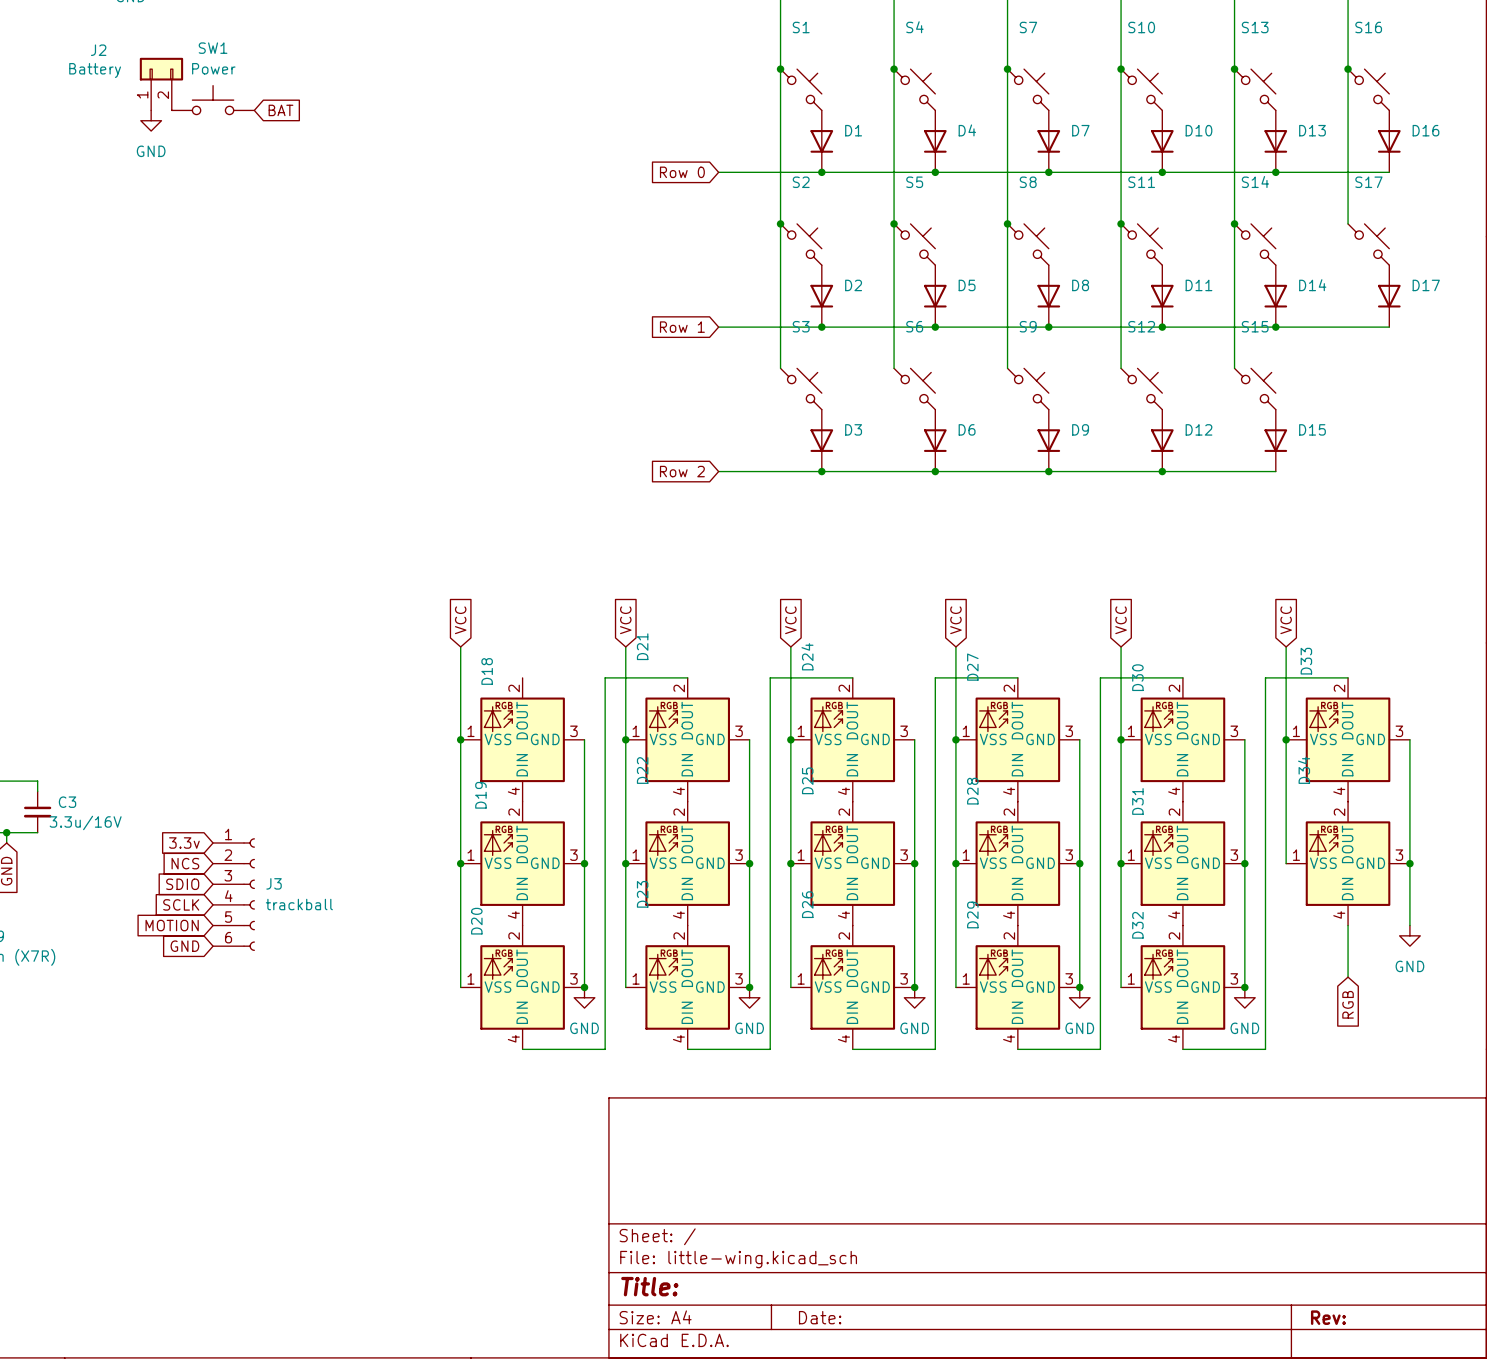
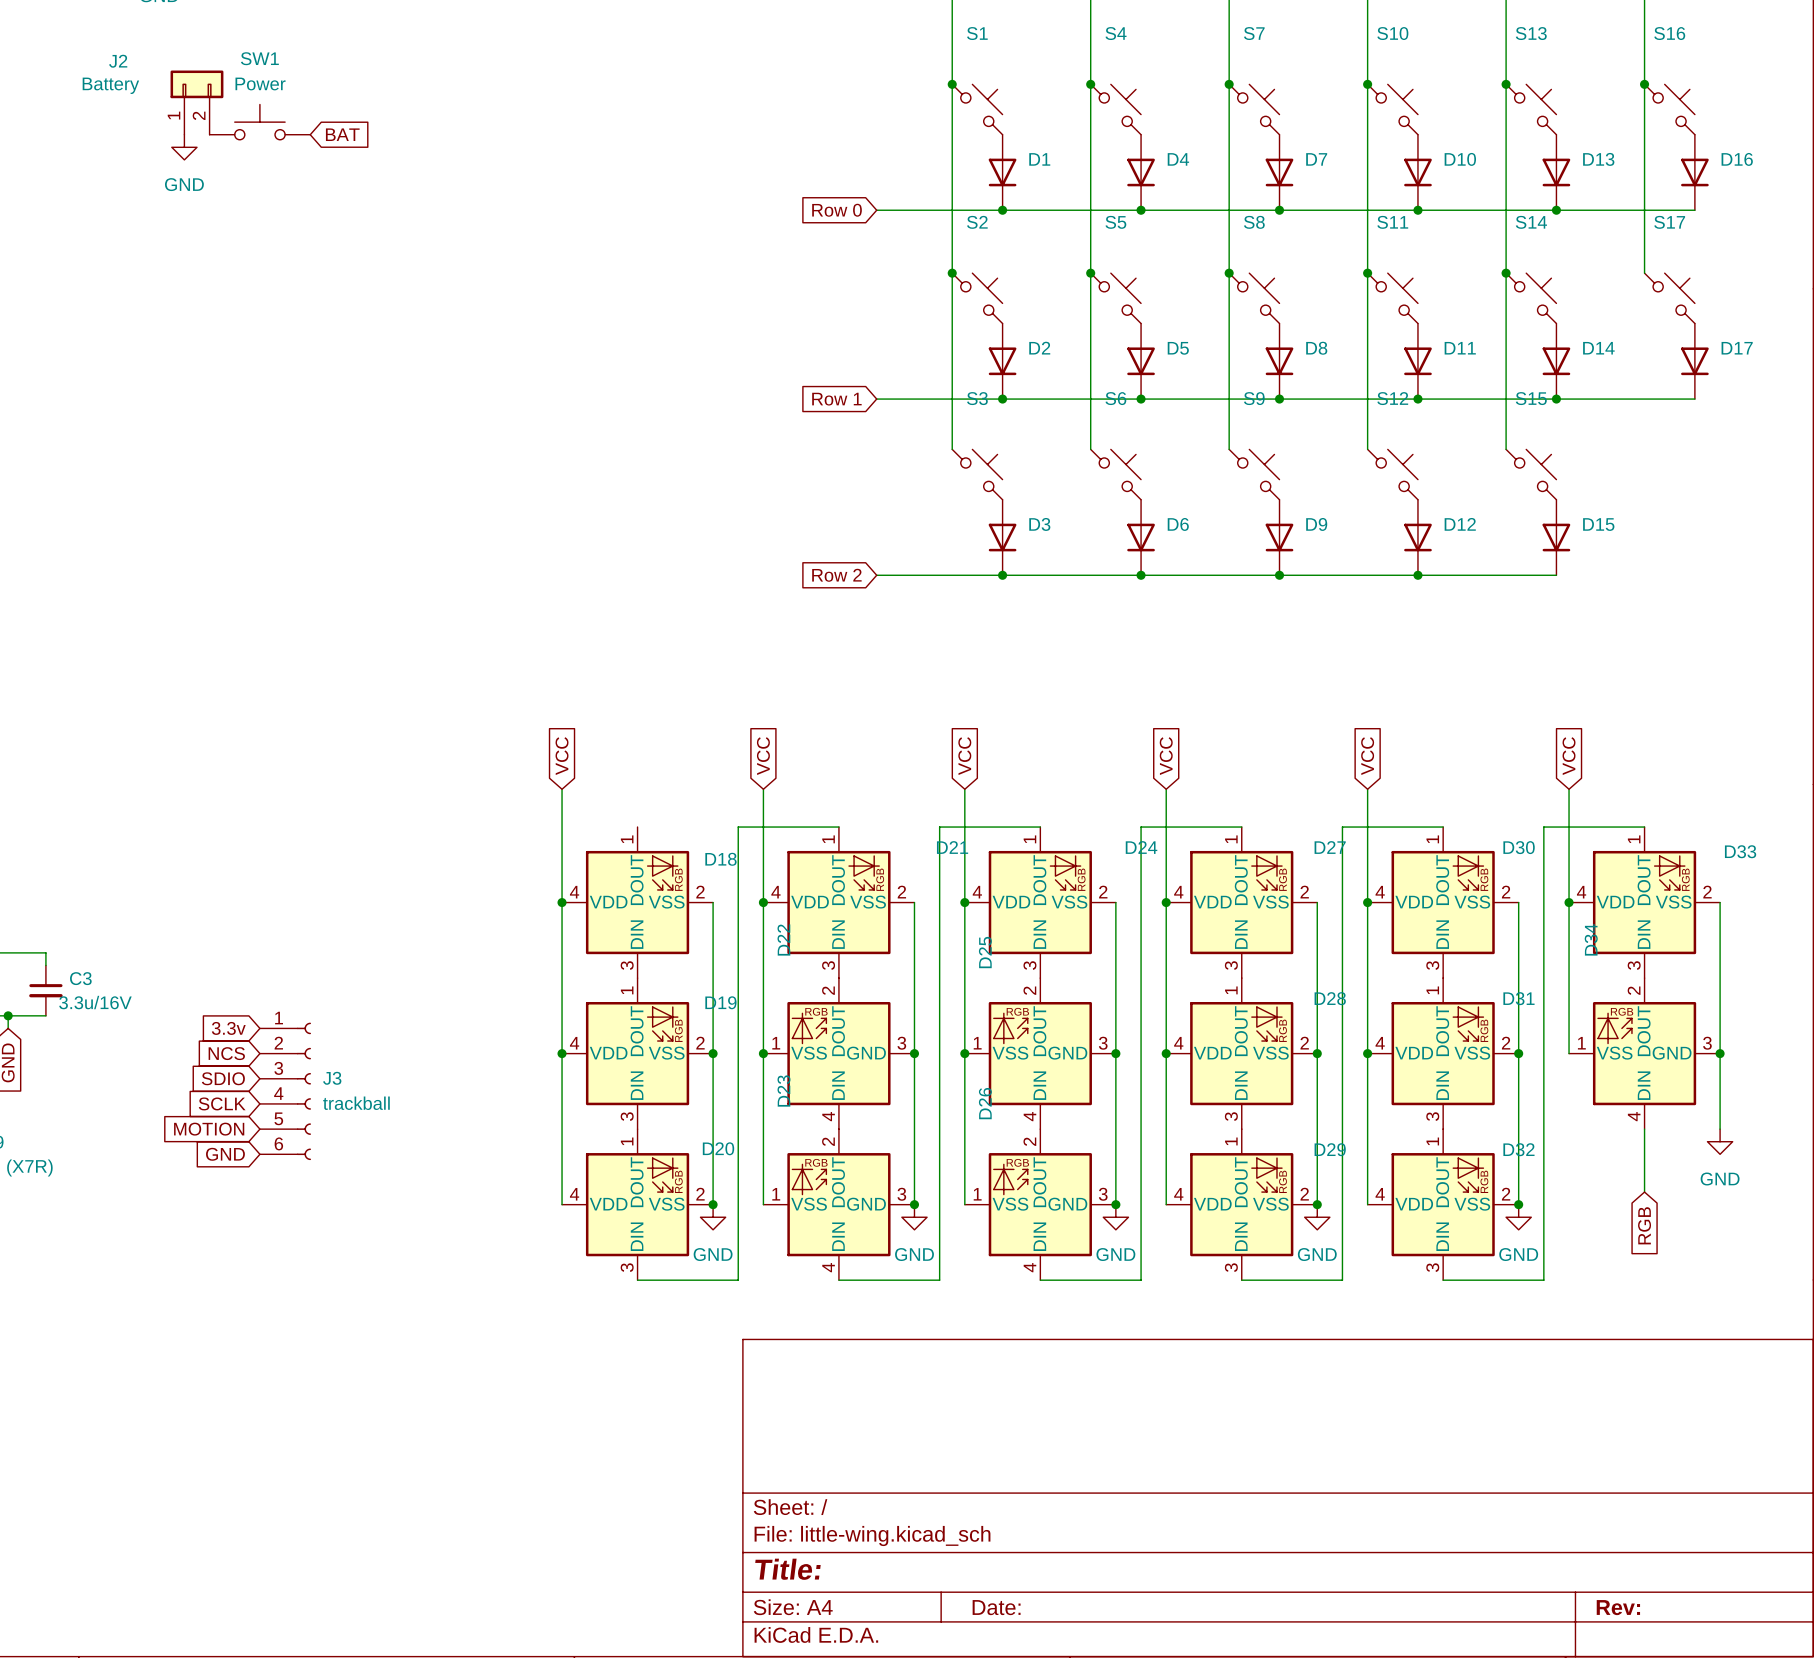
D21 name position: D21 (642, 646) -> D21 (952, 847)
D24 name position: D24 (807, 656) -> D24 (1141, 847)
D33 name position: D33 (1306, 661) -> D33 (1740, 851)
D27 name position: D27 (972, 667) -> D27 (1330, 847)
D18 name position: D18 (487, 671) -> D18 (720, 859)
D18 symbol: [460, 677, 585, 802] -> [562, 827, 714, 979]
D21 symbol: [625, 677, 750, 802] -> [763, 827, 915, 979]
D24 symbol: [790, 677, 915, 802] -> [964, 827, 1116, 979]
D27 symbol: [955, 677, 1080, 802] -> [1166, 827, 1318, 979]
D30 symbol: [1121, 677, 1245, 802] -> [1367, 827, 1519, 979]
D30 name position: D30 (1137, 677) -> D30 (1519, 847)
D33 symbol: [1286, 677, 1410, 802] -> [1569, 827, 1721, 979]
D28 name position: D28 (972, 791) -> D28 (1330, 998)
D19 name position: D19 (480, 795) -> D19 (720, 1002)
D19 symbol: [460, 801, 585, 926] -> [562, 978, 714, 1130]
D28 symbol: [955, 801, 1080, 926] -> [1166, 978, 1318, 1130]
D31 symbol: [1121, 801, 1245, 926] -> [1367, 978, 1519, 1130]
D31 name position: D31 (1137, 801) -> D31 (1518, 998)
D29 name position: D29 (972, 914) -> D29 (1330, 1149)
D20 name position: D20 (476, 921) -> D20 (718, 1148)
D20 symbol: [460, 925, 585, 1050] -> [562, 1129, 714, 1281]
D29 symbol: [955, 925, 1080, 1050] -> [1166, 1129, 1318, 1281]
D32 symbol: [1121, 925, 1245, 1050] -> [1367, 1129, 1519, 1281]
D32 name position: D32 (1137, 925) -> D32 (1518, 1149)

